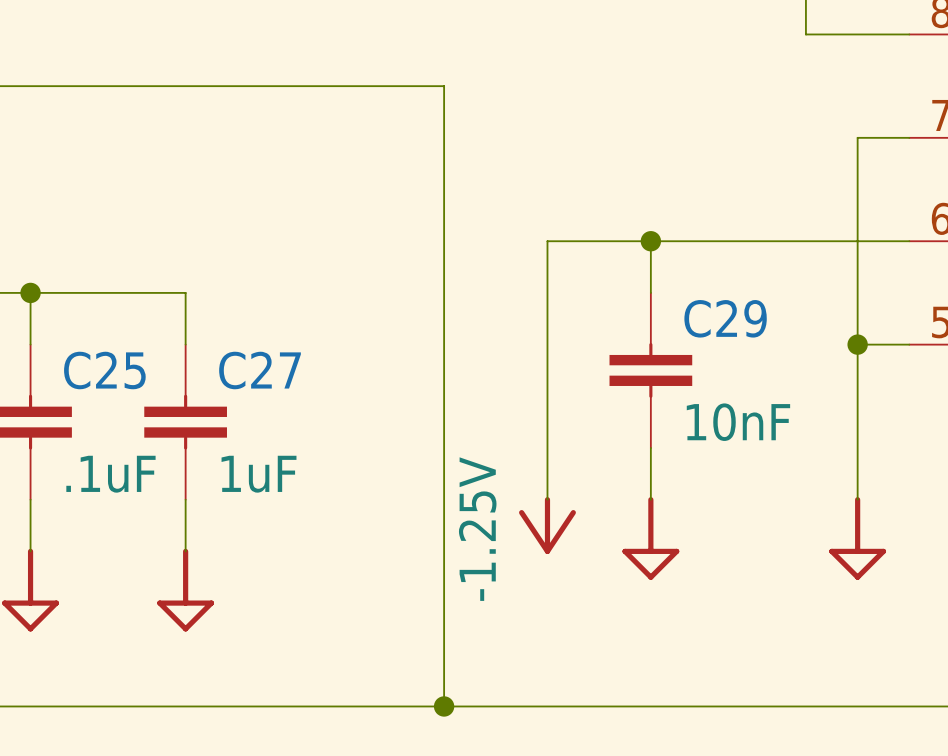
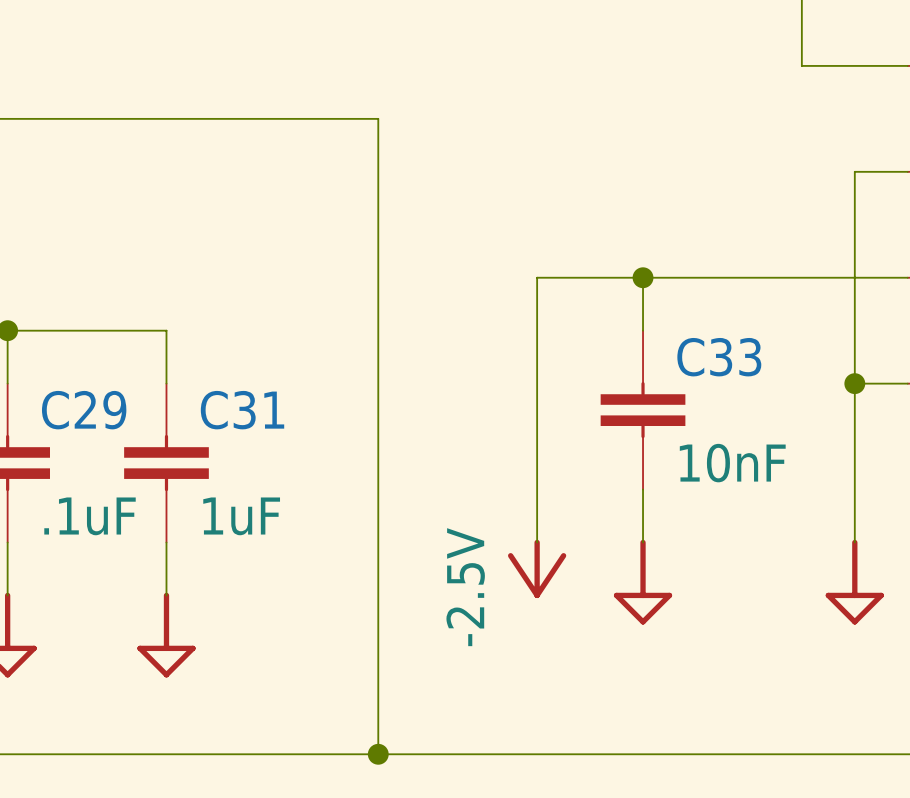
wire: (392, 86) (444, 86) (444, 706) -> (378, 118) (378, 754)
C29 name: C29 (725, 318) -> C33 (719, 357)
C25 name: C25 (104, 370) -> C29 (84, 410)
C27 name: C27 (260, 370) -> C31 (242, 410)
part value: -1.25V (477, 529) -> -2.5V (465, 587)
junction position: (444, 706) -> (378, 754)

